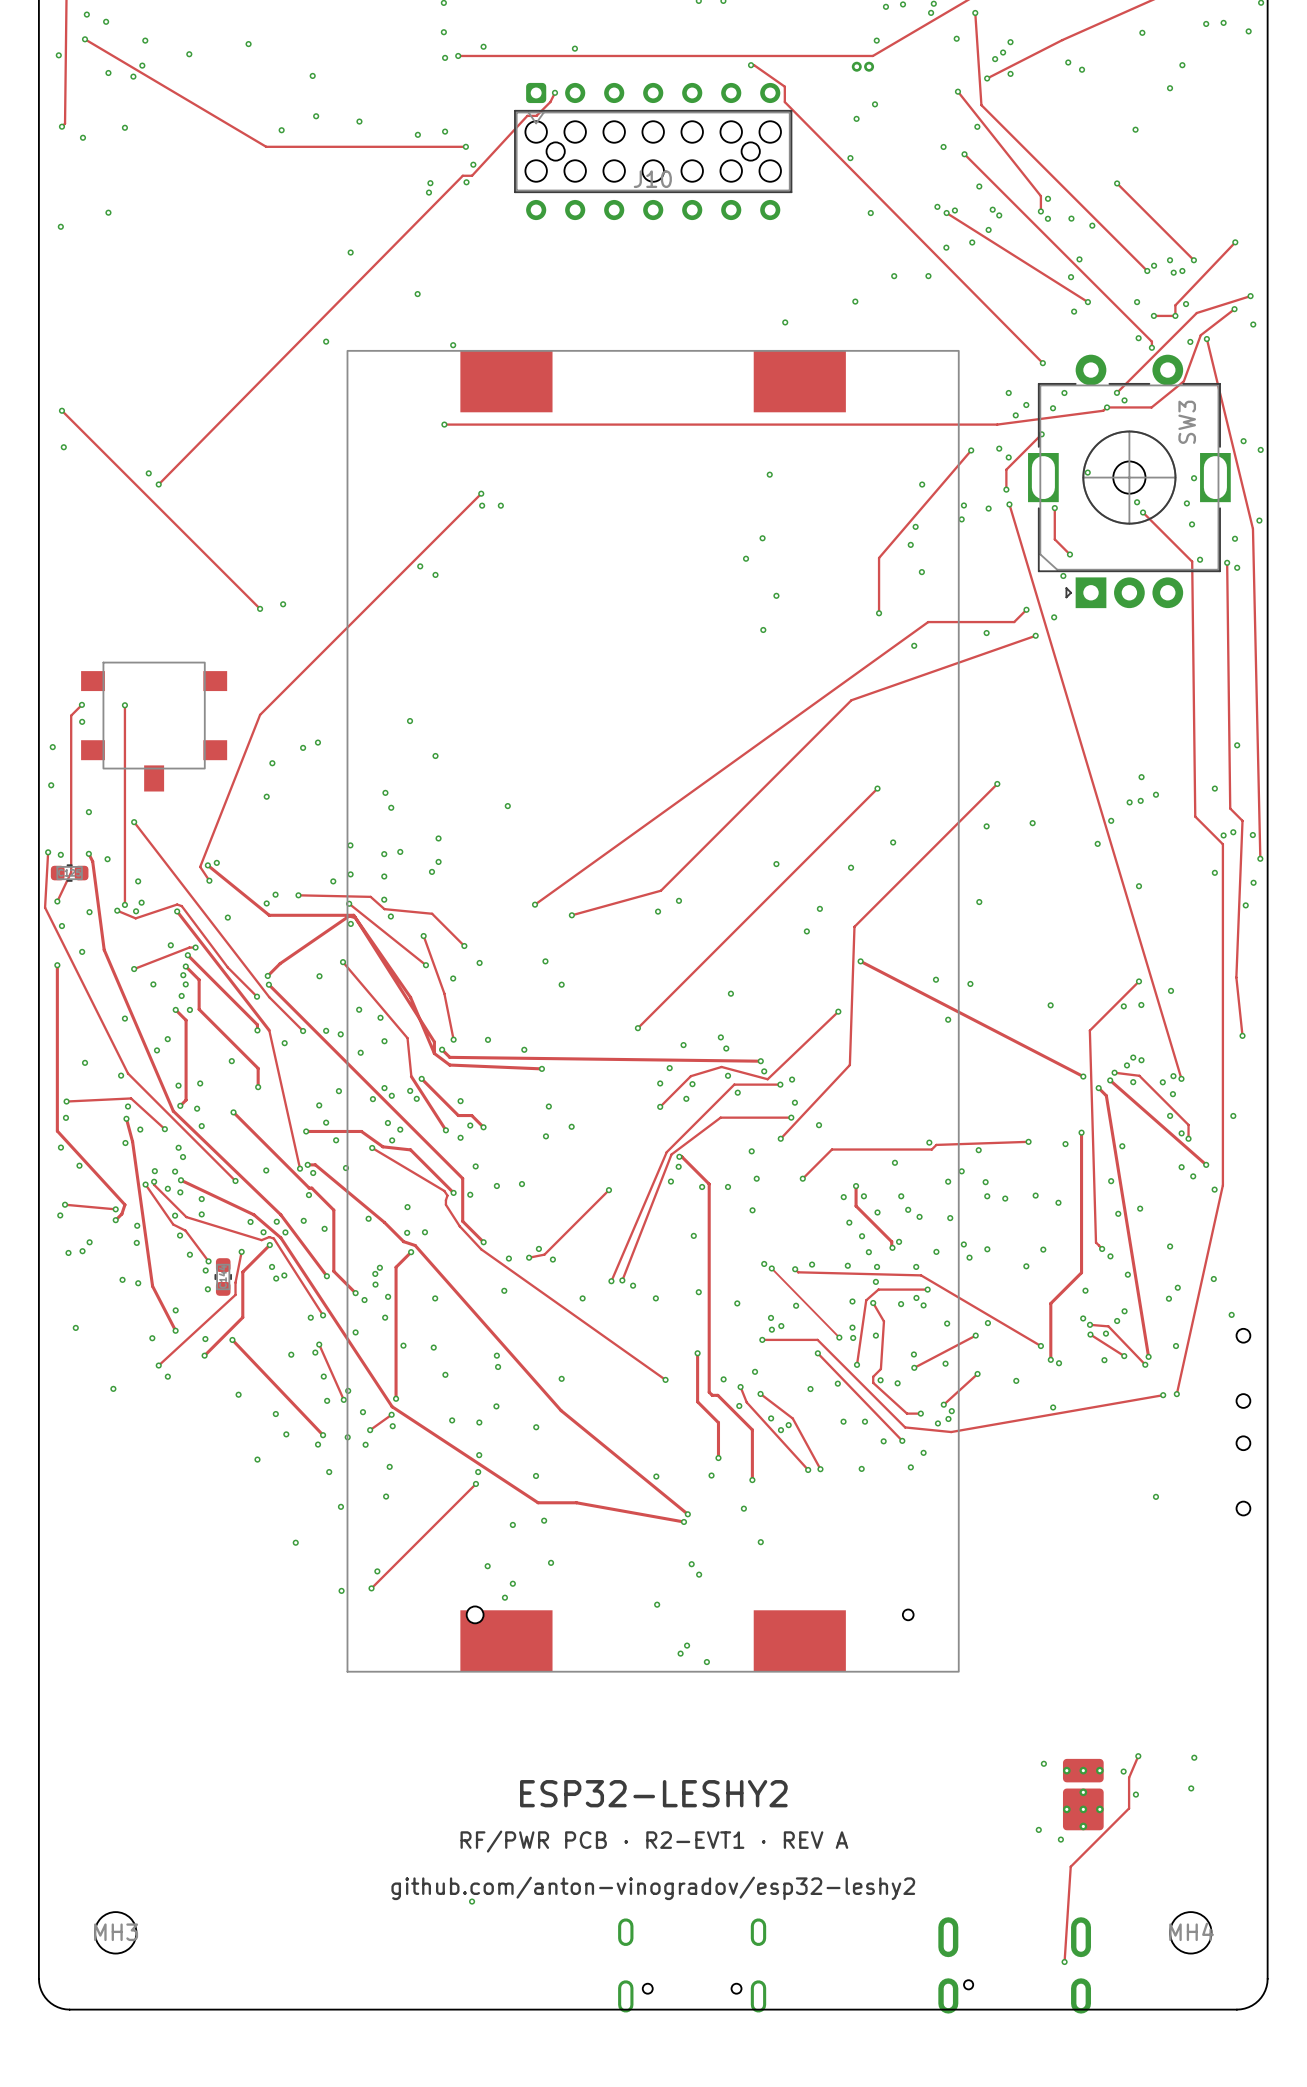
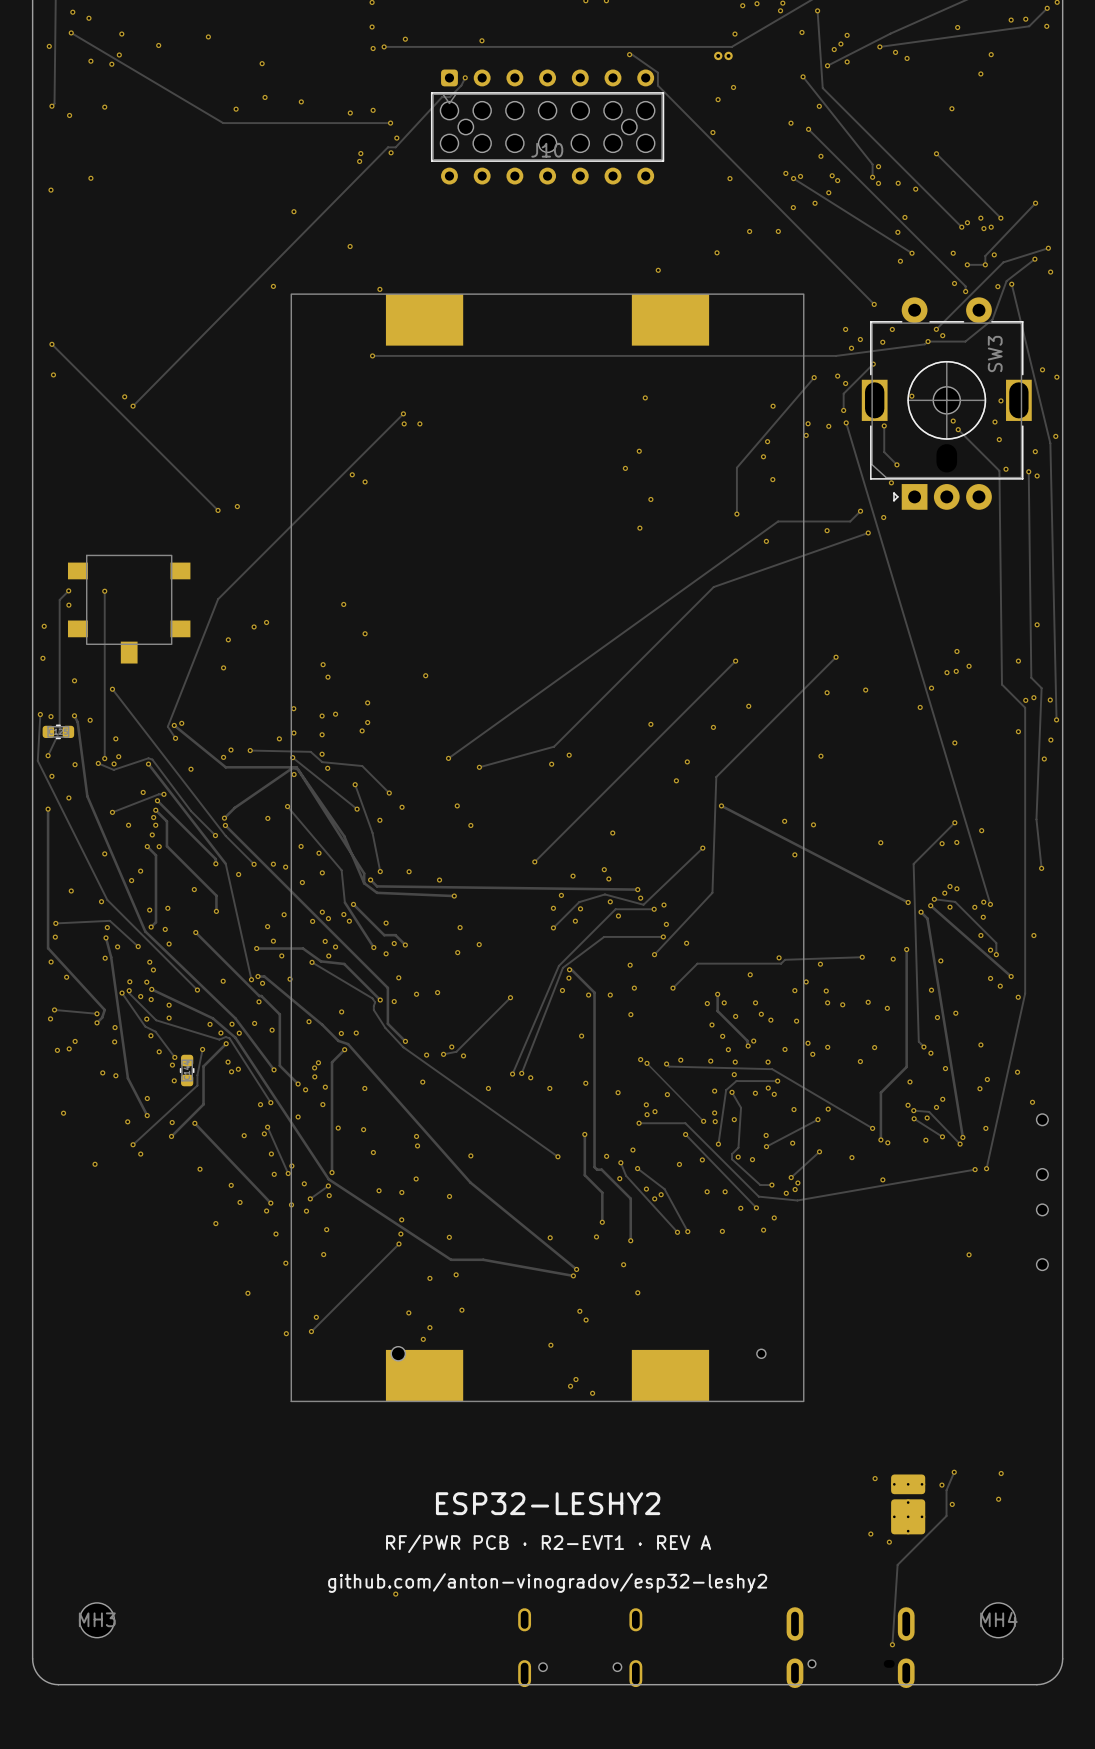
track: none -> (1047, 8) (1029, 26) (879, 46)
via: none -> (1047, 8)
via: none -> (879, 46)

